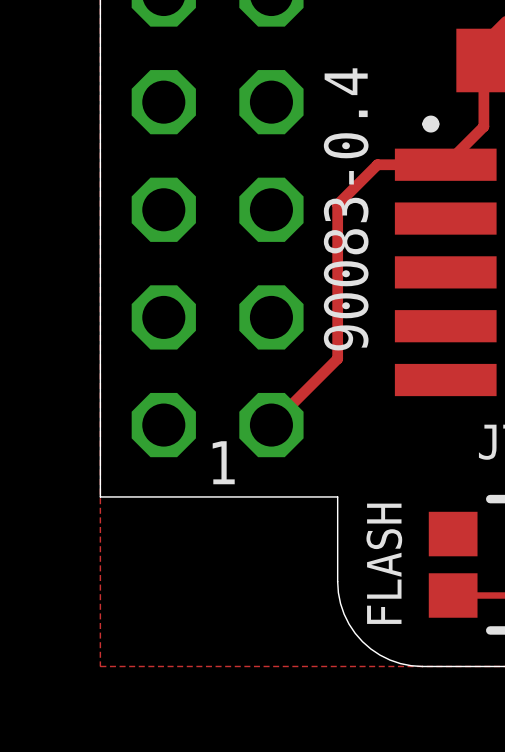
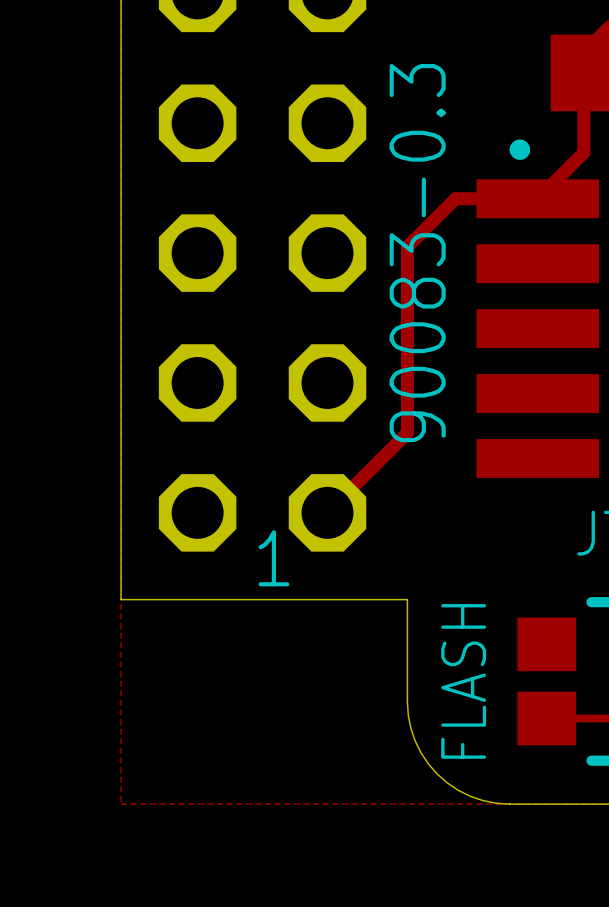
text: 90083-0.4 (346, 209) -> 90083-0.3 (417, 253)

